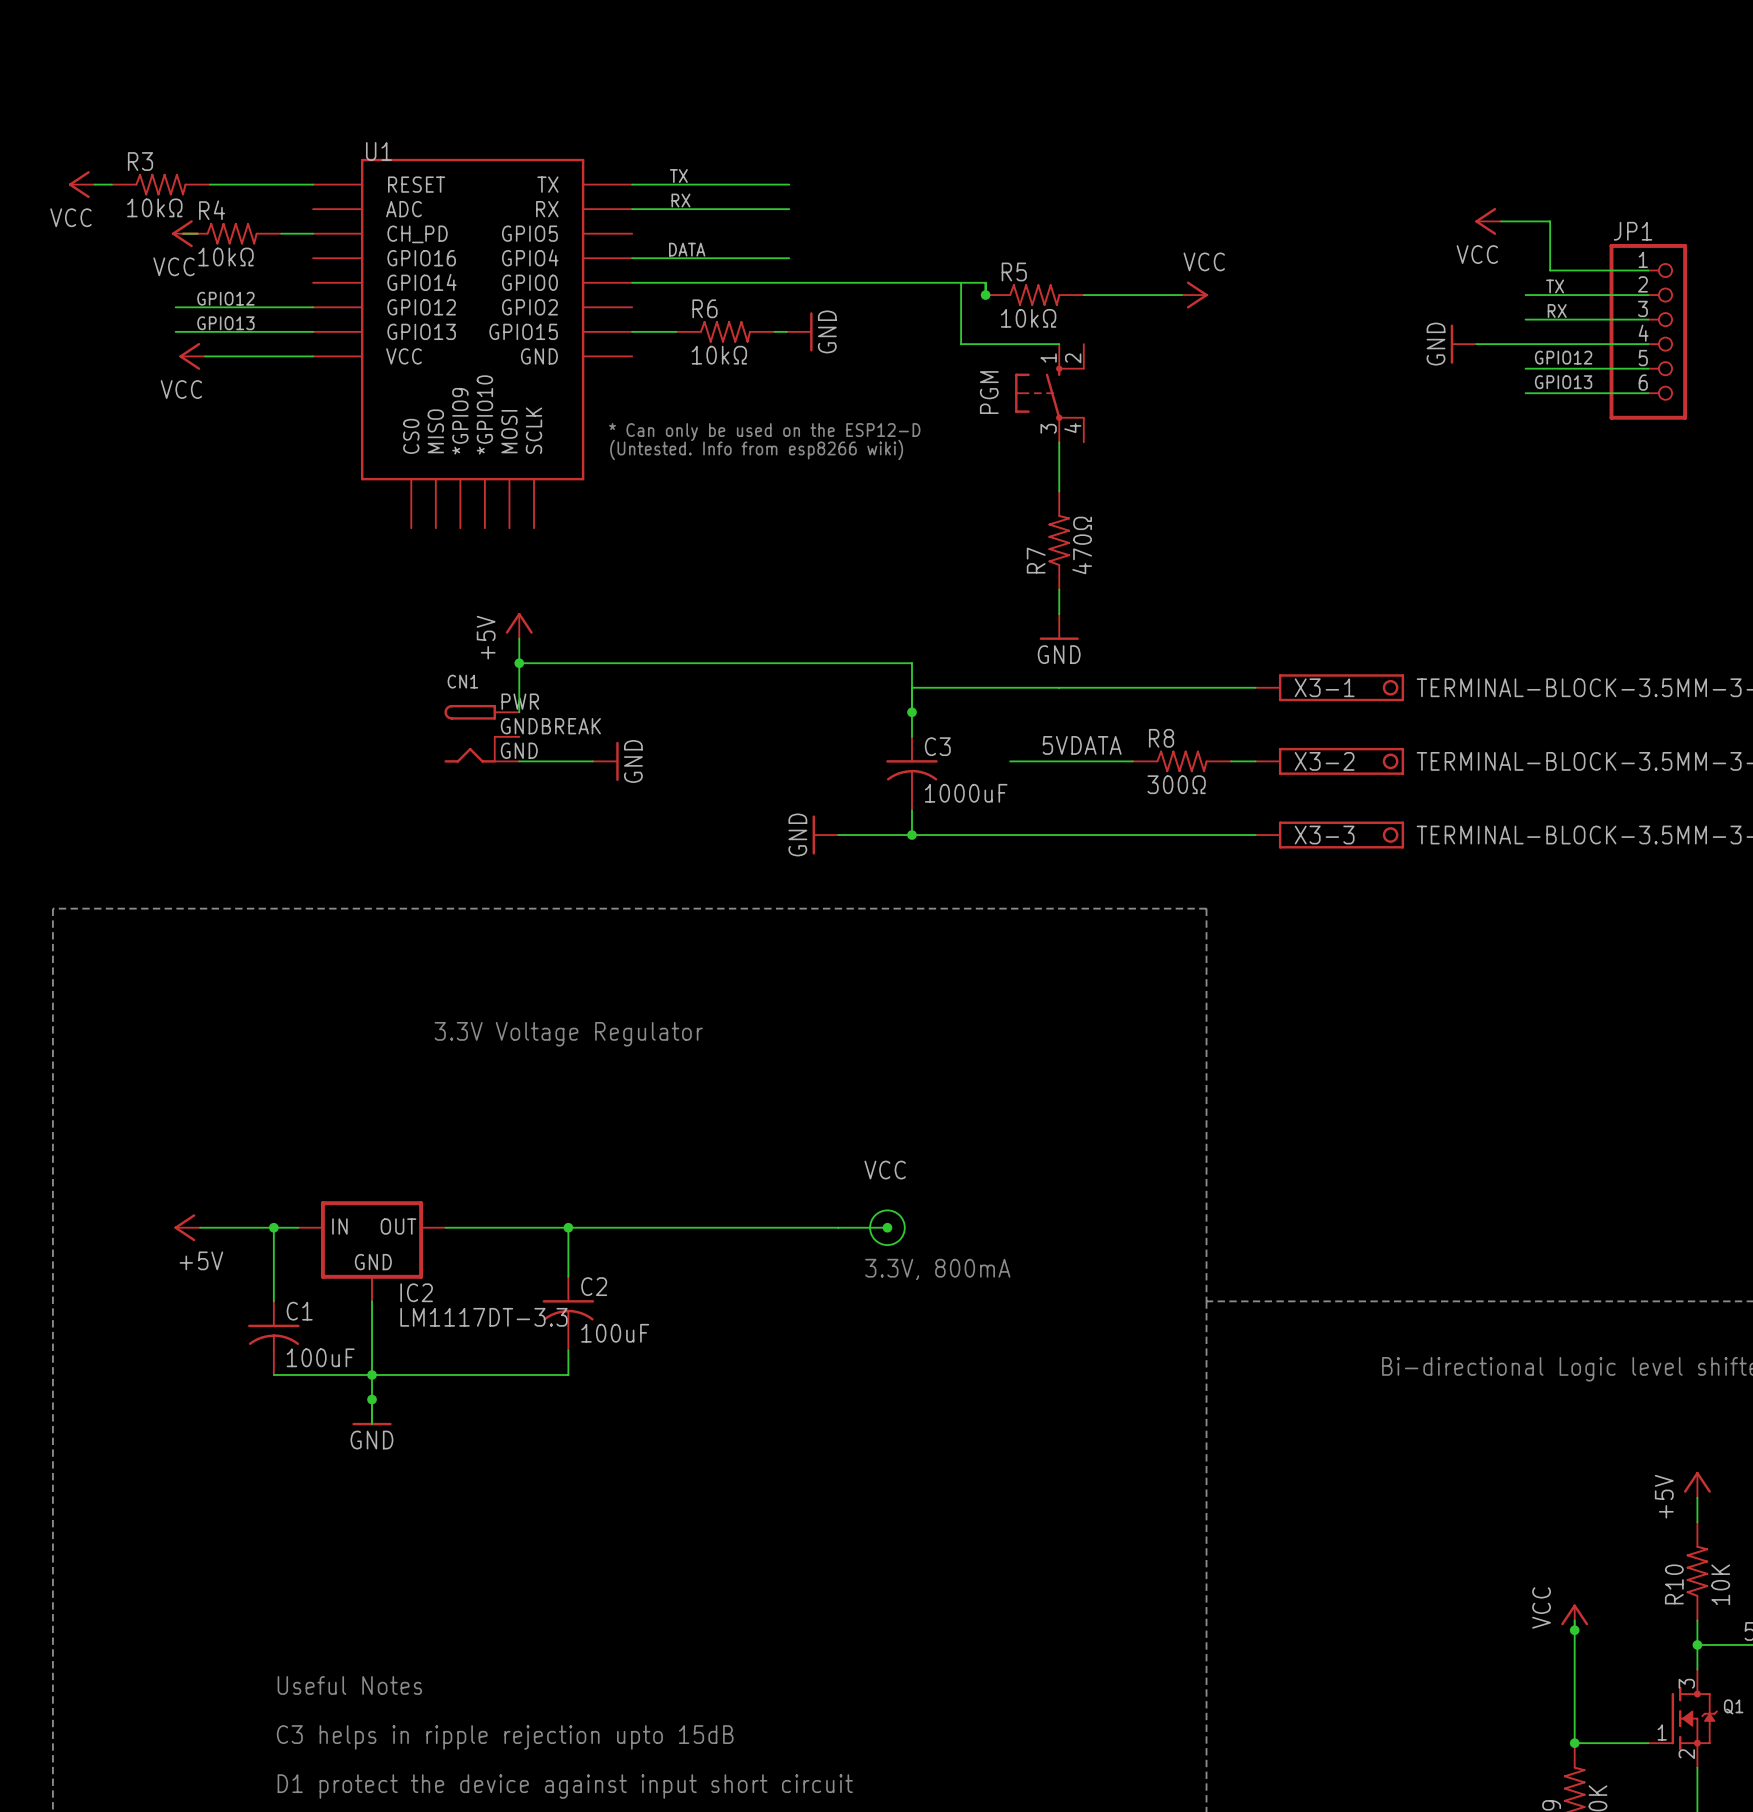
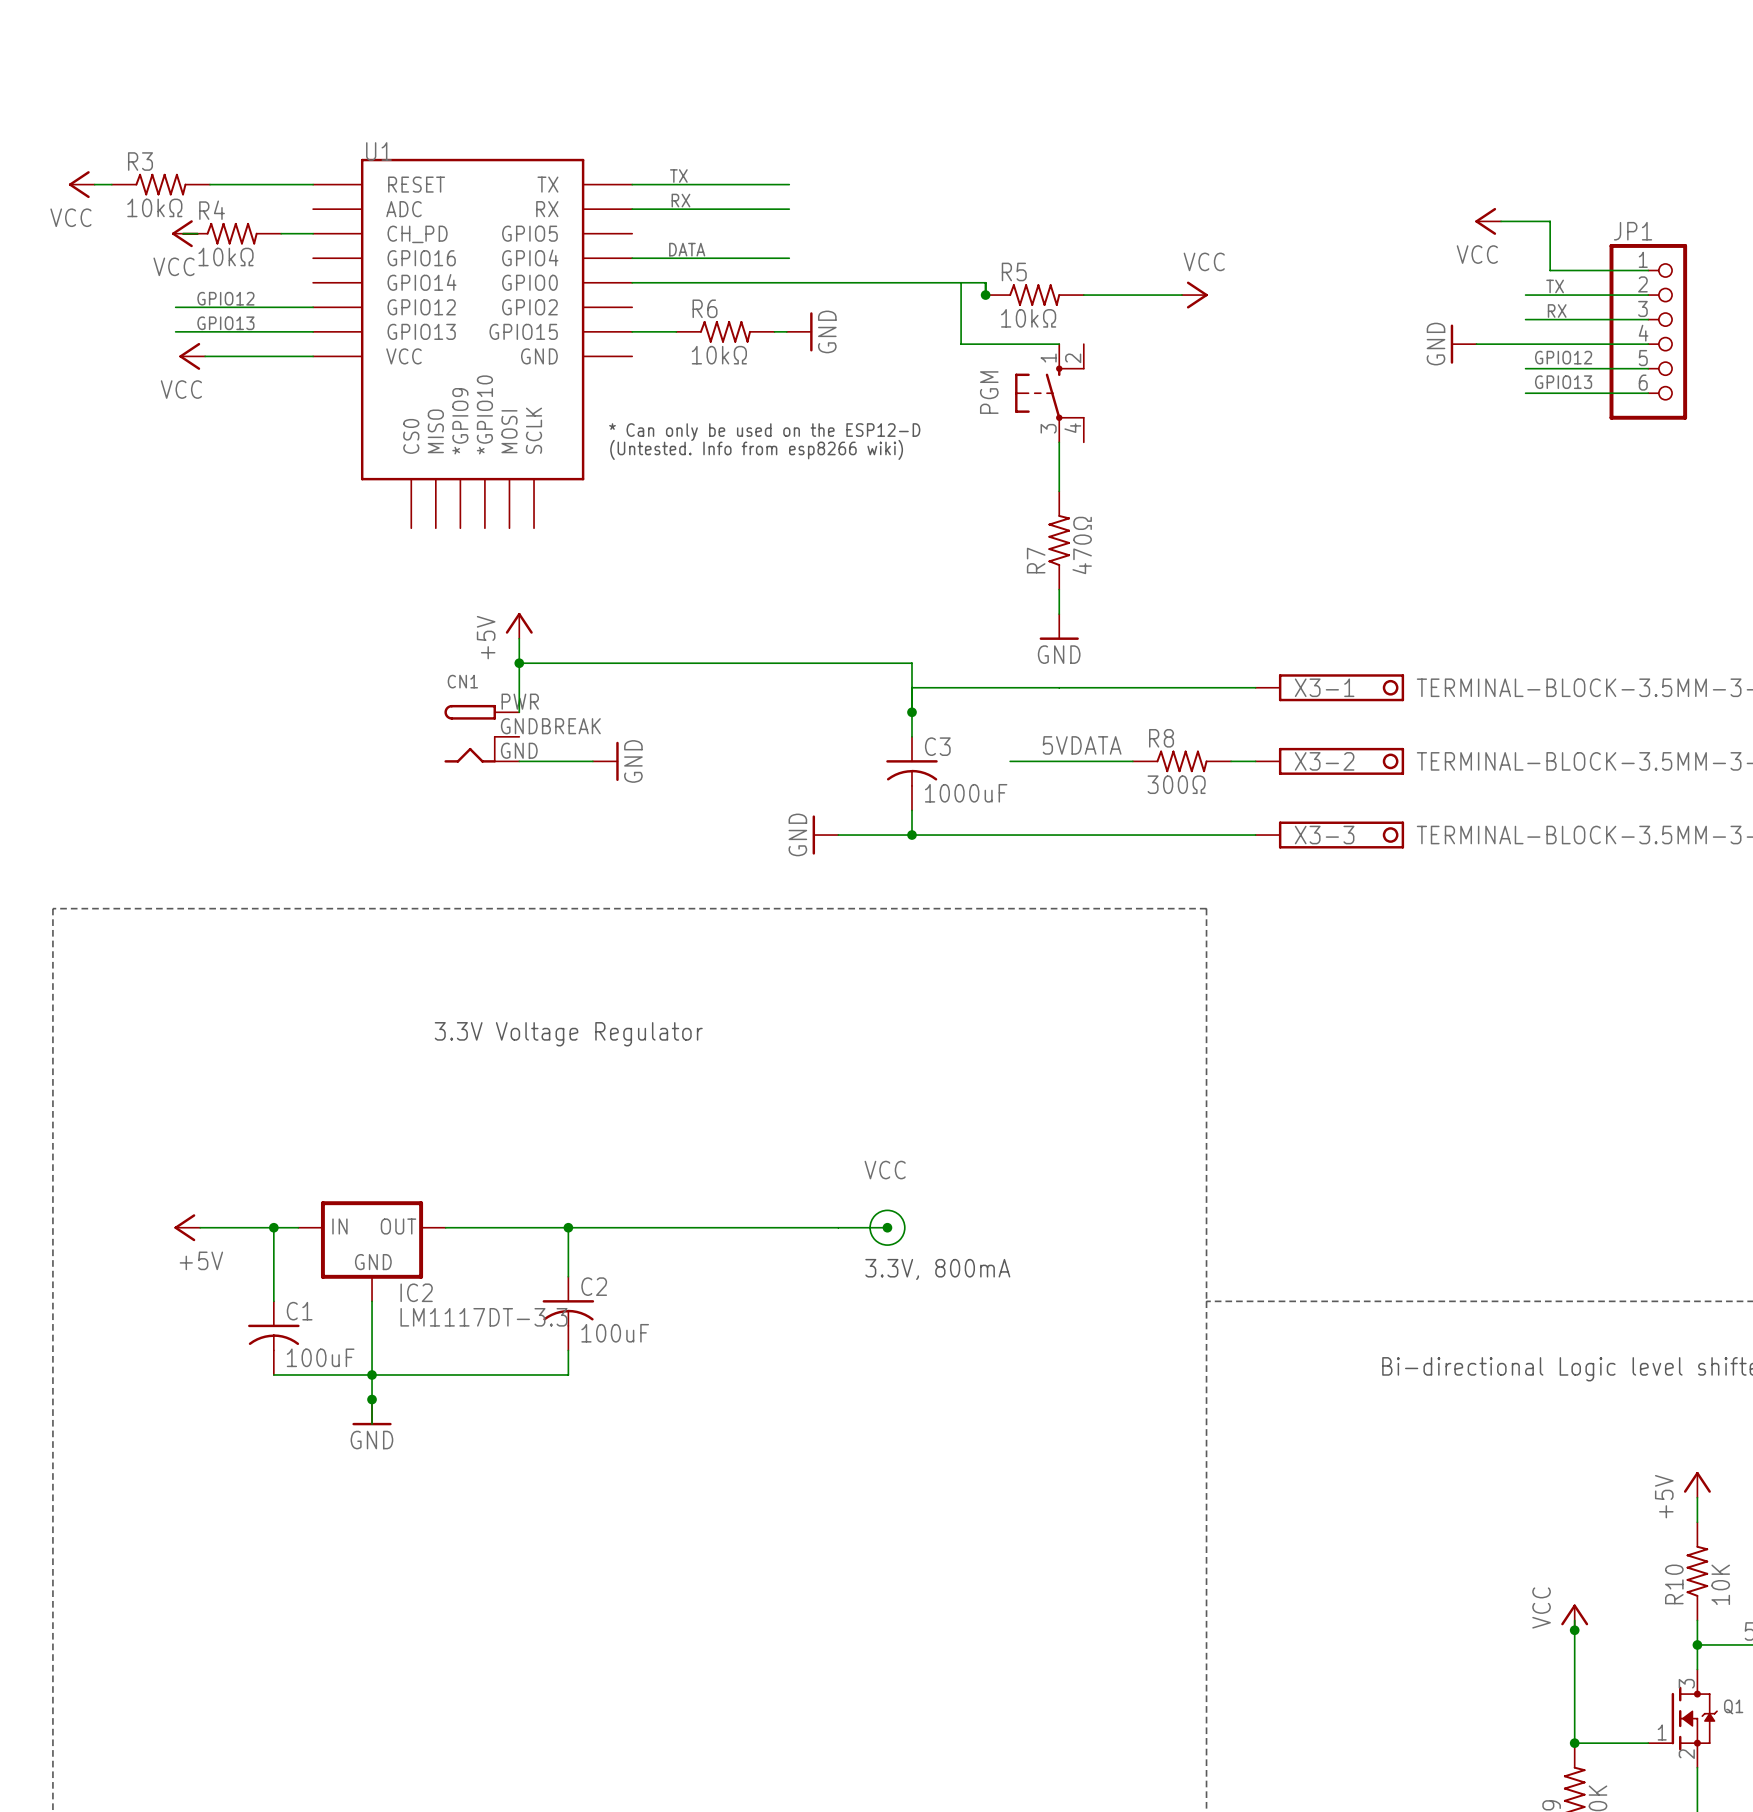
text: Useful Notes (349, 1685) -> none
text: C3 helps in ripple rejection upto 15dB (505, 1737) -> none
text: D1 protect the device against input short circuit (565, 1786) -> none

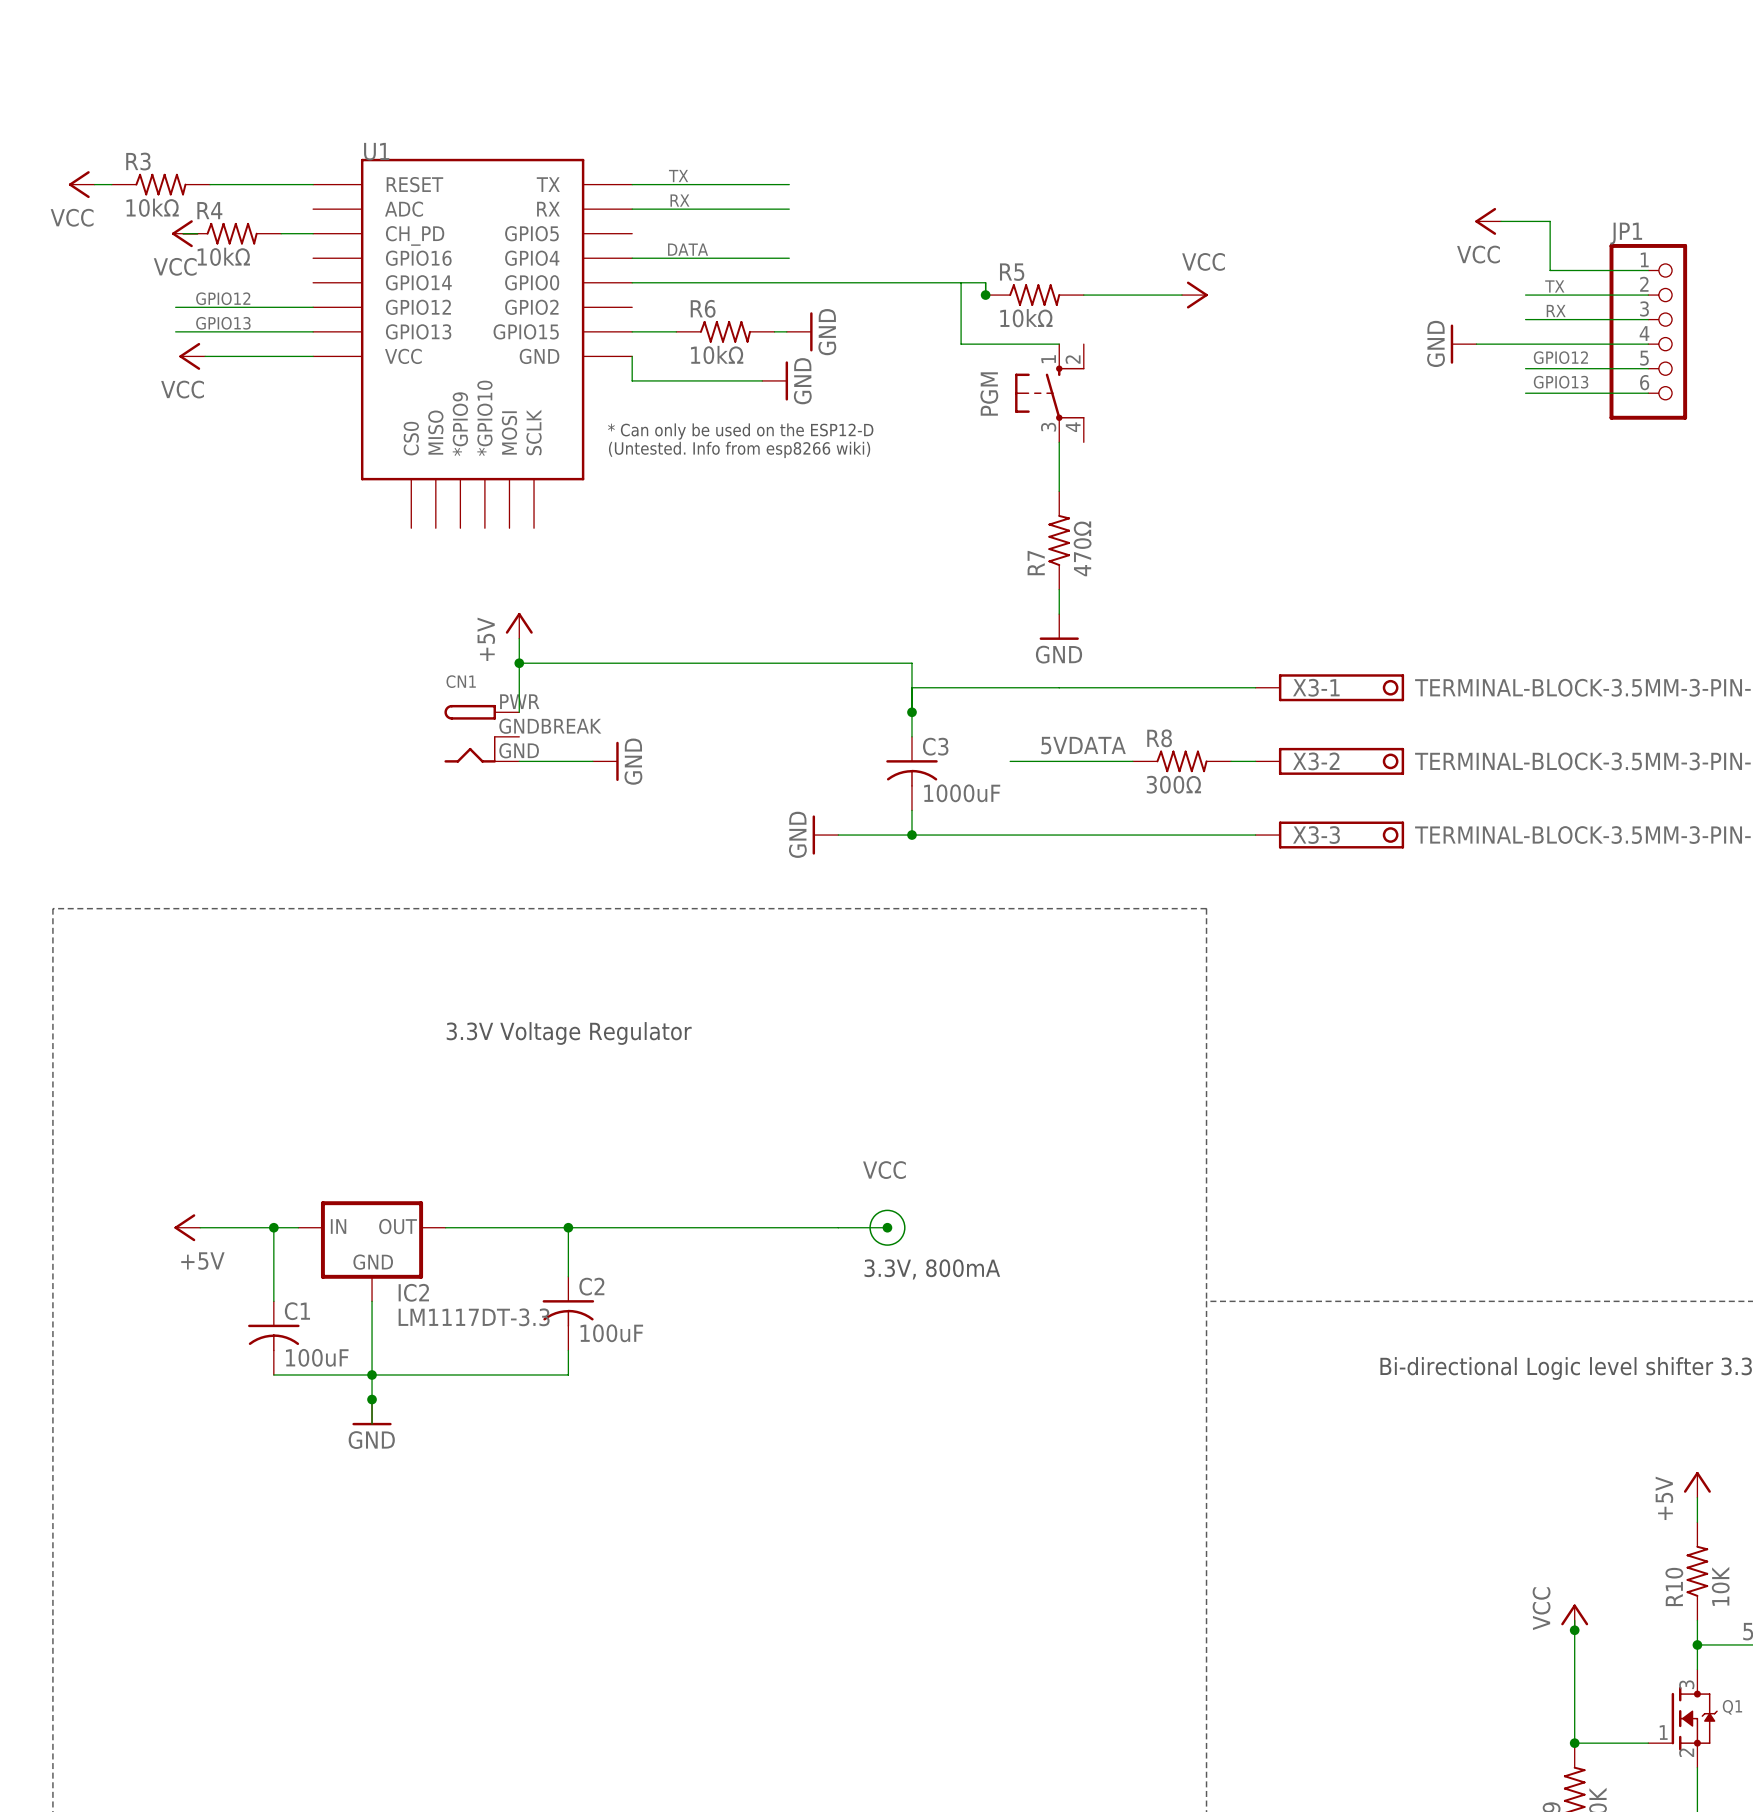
wire: none -> (632, 356) (632, 380) (762, 380)
power symbol: none -> GND (775, 380)

